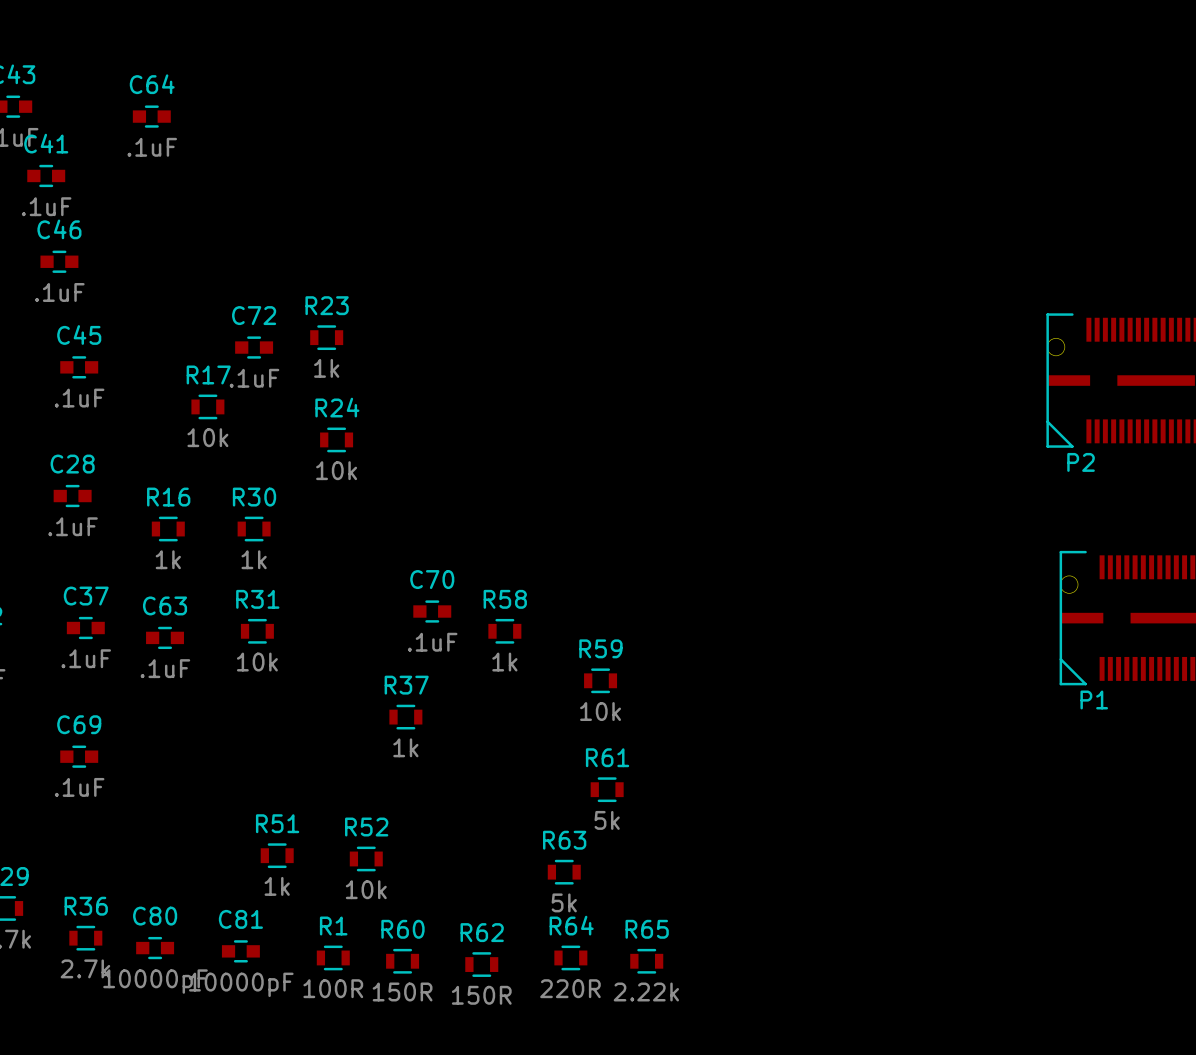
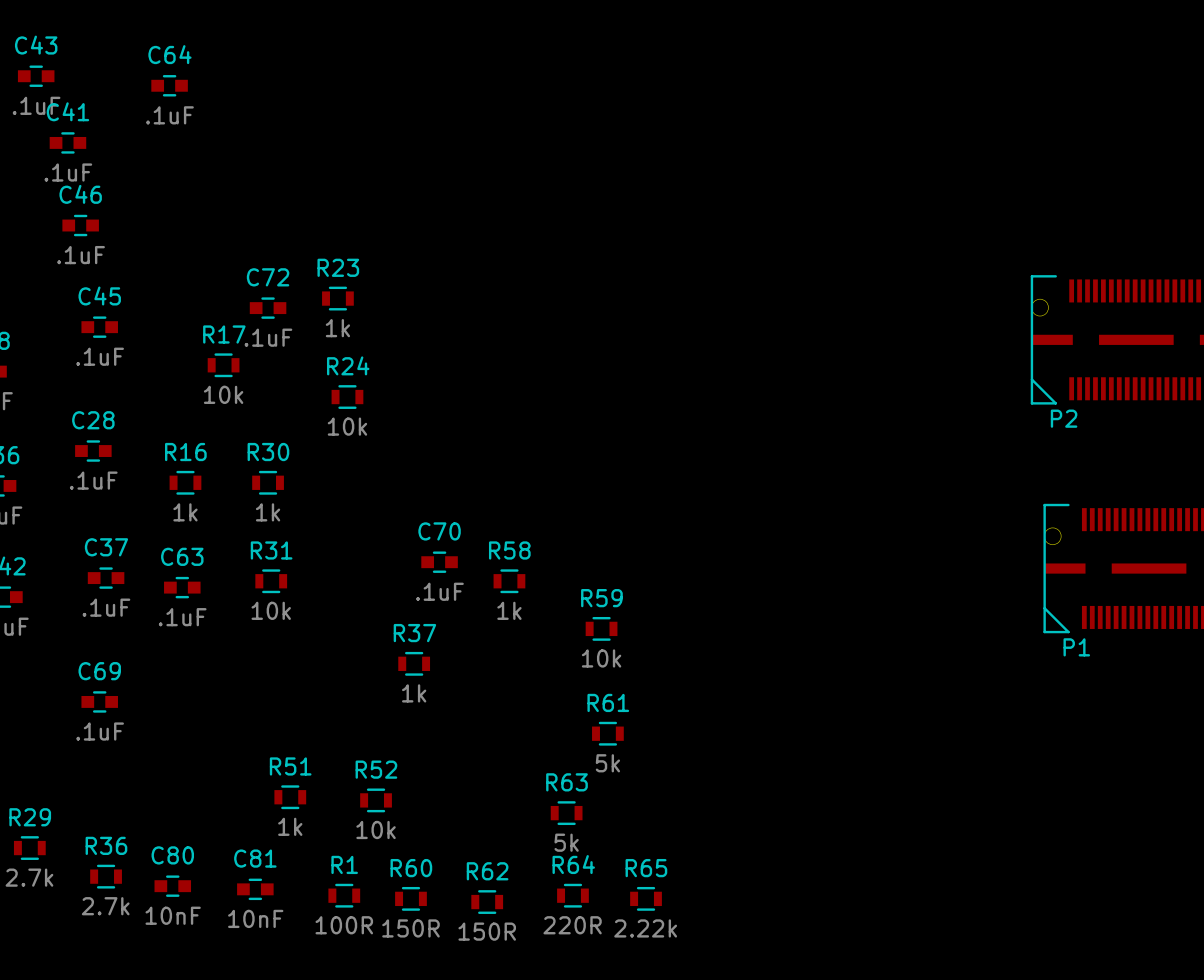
C80 value: 10000pF (155, 981) -> 10nF (173, 915)
C81 value: 10000pF (241, 984) -> 10nF (255, 918)

